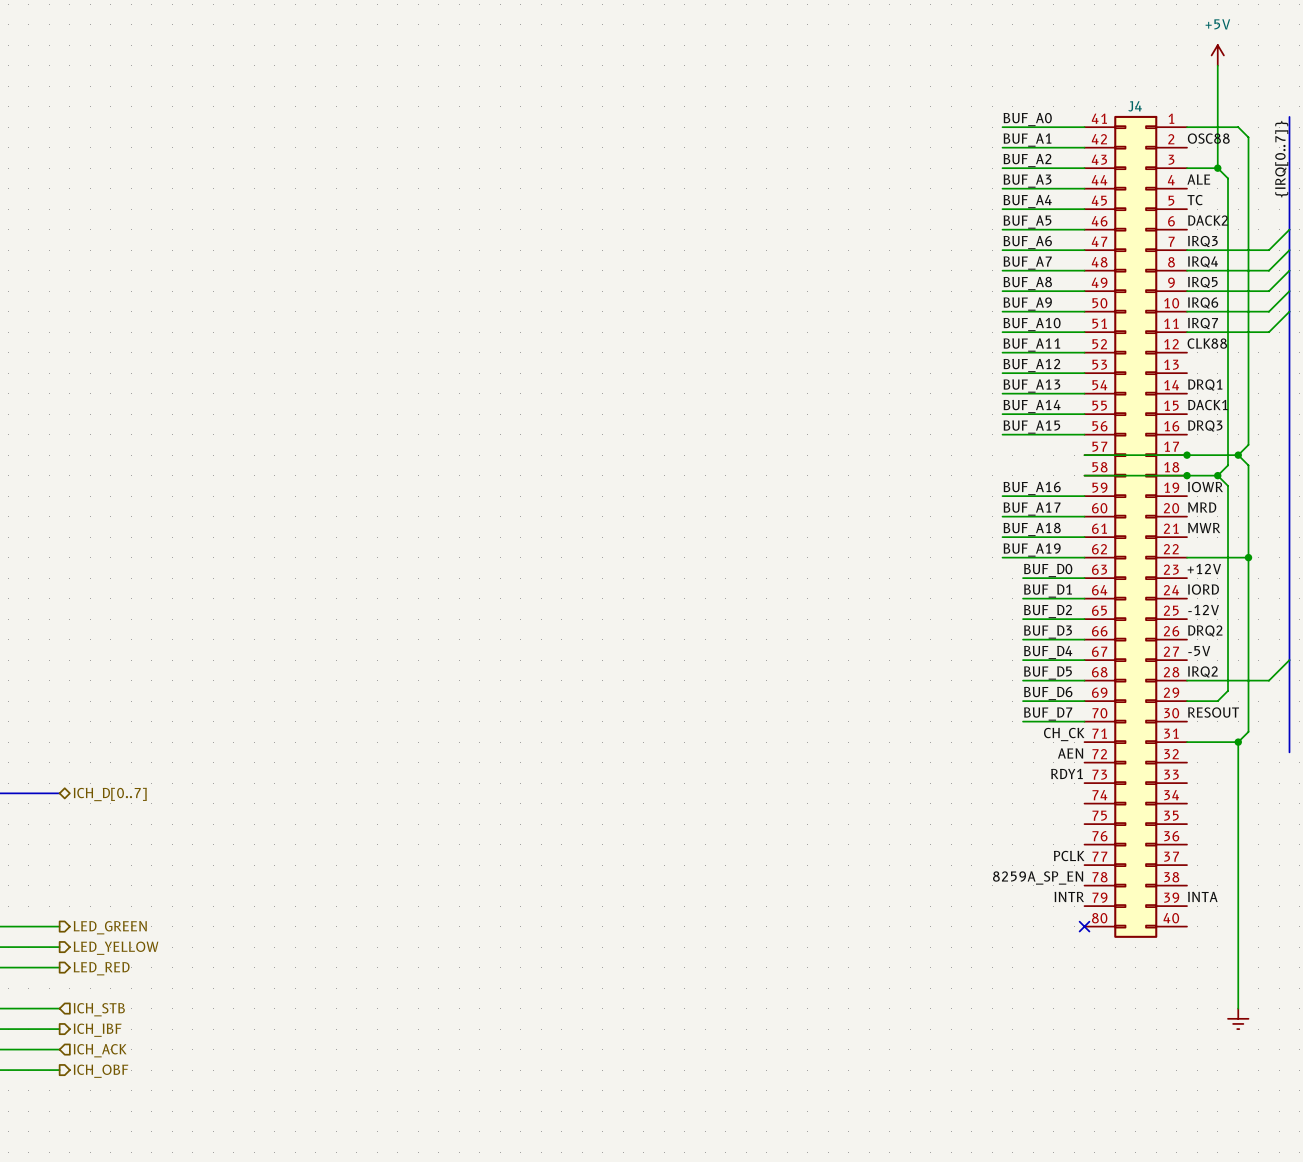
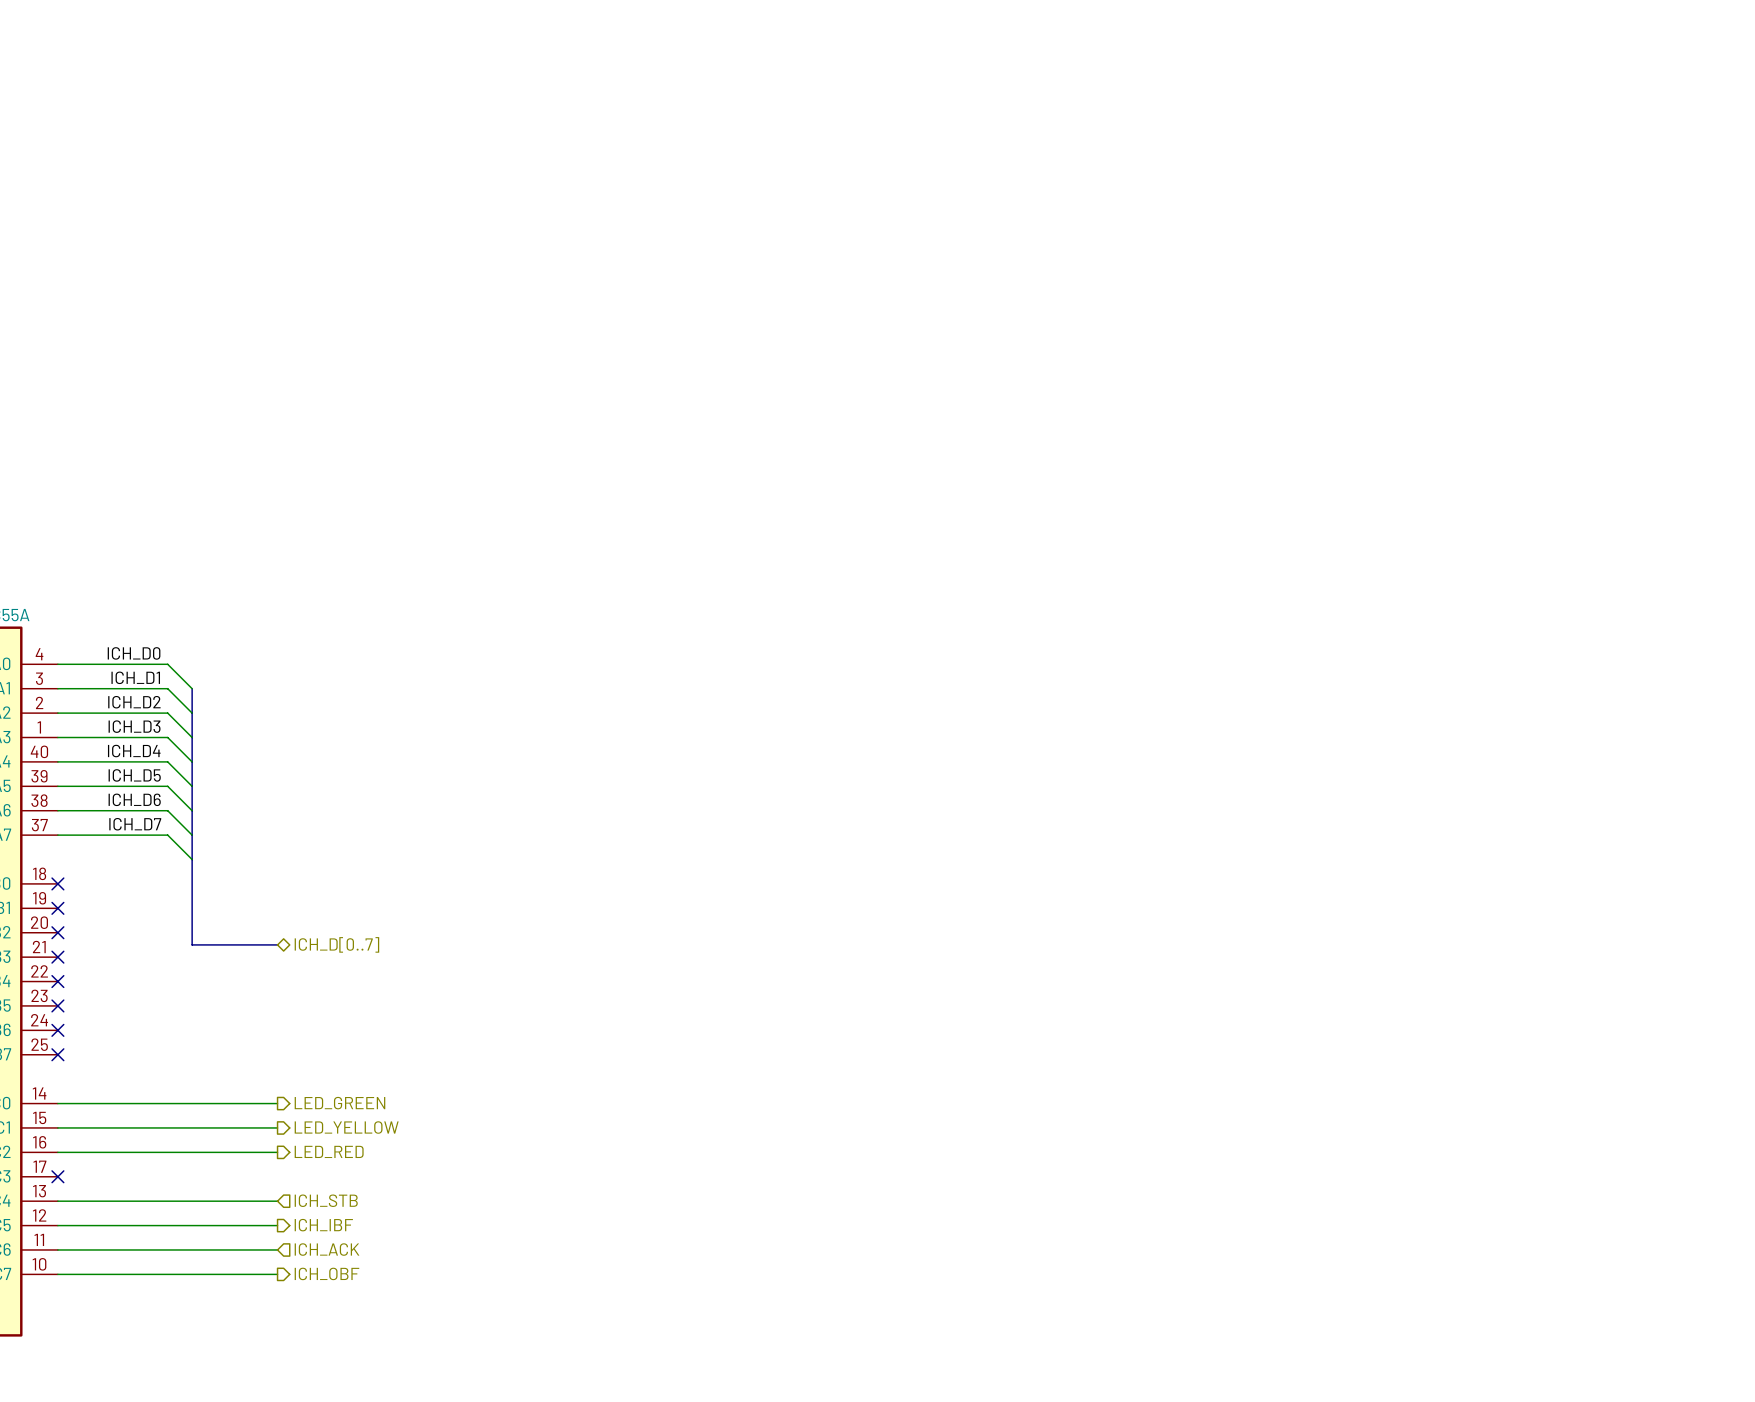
power symbol: +5V (1217, 55) -> none
wire: (1217, 65) (1217, 168) -> none
bus: (1289, 116) (1289, 752) -> none
label: BUF_A0 (1027, 119) -> none
wire: (1002, 127) (1084, 127) -> none
wire: (1187, 127) (1238, 127) (1248, 137) (1248, 444) (1238, 455) -> none
label: OSC88 (1208, 138) -> none
label: BUF_A1 (1027, 140) -> none
wire: (1002, 147) (1084, 147) -> none
label: {IRQ[0..7]} (1281, 159) -> none
label: BUF_A2 (1027, 160) -> none
wire: (1002, 168) (1084, 168) -> none
wire: (1187, 168) (1217, 168) -> none
wire: (1217, 168) (1228, 178) (1228, 465) (1217, 475) -> none
junction: (1217, 168) -> none
label: ALE (1198, 179) -> none
label: BUF_A3 (1027, 181) -> none
wire: (1002, 188) (1084, 188) -> none
label: TC (1195, 200) -> none
label: BUF_A4 (1027, 201) -> none
wire: (1002, 209) (1084, 209) -> none
label: DACK2 (1207, 220) -> none
label: BUF_A5 (1027, 222) -> none
wire: (1002, 229) (1084, 229) -> none
wire: (1289, 229) (1268, 250) (1187, 250) -> none
label: IRQ3 (1202, 241) -> none
label: BUF_A6 (1027, 242) -> none
wire: (1002, 250) (1084, 250) -> none
wire: (1289, 250) (1268, 270) (1187, 270) -> none
label: IRQ4 (1203, 262) -> none
label: BUF_A7 (1027, 263) -> none
wire: (1002, 270) (1084, 270) -> none
wire: (1289, 270) (1268, 291) (1187, 291) -> none
label: IRQ5 (1202, 282) -> none
label: BUF_A8 (1027, 283) -> none
wire: (1002, 291) (1084, 291) -> none
wire: (1289, 291) (1268, 311) (1187, 311) -> none
label: IRQ6 (1203, 303) -> none
label: BUF_A9 (1027, 304) -> none
wire: (1002, 311) (1084, 311) -> none
wire: (1289, 311) (1268, 332) (1187, 332) -> none
label: IRQ7 (1203, 323) -> none
label: BUF_A10 (1032, 324) -> none
wire: (1002, 332) (1084, 332) -> none
label: CLK88 (1207, 343) -> none
label: BUF_A11 (1031, 345) -> none
wire: (1002, 352) (1084, 352) -> none
label: BUF_A12 (1031, 365) -> none
wire: (1002, 373) (1084, 373) -> none
label: DRQ1 (1205, 384) -> none
label: BUF_A13 (1031, 386) -> none
wire: (1002, 393) (1084, 393) -> none
label: DACK1 (1207, 405) -> none
label: BUF_A14 (1032, 406) -> none
wire: (1002, 414) (1084, 414) -> none
label: DRQ3 (1205, 426) -> none
label: BUF_A15 (1031, 427) -> none
wire: (1002, 434) (1084, 434) -> none
wire: (1084, 455) (1238, 455) -> none
junction: (1187, 455) -> none
wire: (1238, 455) (1248, 465) (1248, 731) (1238, 742) -> none
junction: (1238, 455) -> none
wire: (1084, 475) (1217, 475) -> none
junction: (1187, 475) -> none
wire: (1217, 475) (1228, 485) (1228, 690) (1217, 701) (1187, 701) -> none
junction: (1217, 475) -> none
label: IOWR (1205, 487) -> none
label: BUF_A16 (1032, 488) -> none
wire: (1002, 496) (1084, 496) -> none
label: MRD (1202, 507) -> none
label: BUF_A17 (1032, 509) -> none
wire: (1002, 516) (1084, 516) -> none
J4: (1135, 526) -> none
label: MWR (1204, 527) -> none
label: BUF_A18 (1032, 529) -> none
wire: (1002, 537) (1084, 537) -> none
label: BUF_A19 (1032, 550) -> none
wire: (1002, 557) (1084, 557) -> none
wire: (1187, 557) (1248, 557) -> none
junction: (1248, 557) -> none
label: +12V (1204, 569) -> none
label: BUF_D0 (1048, 570) -> none
wire: (1023, 578) (1084, 578) -> none
label: IORD (1203, 589) -> none
label: BUF_D1 (1048, 591) -> none
wire: (1023, 598) (1084, 598) -> none
label: -12V (1203, 610) -> none
label: BUF_D2 (1048, 611) -> none
wire: (1023, 619) (1084, 619) -> none
label: DRQ2 (1205, 630) -> none
label: BUF_D3 (1048, 632) -> none
wire: (1023, 639) (1084, 639) -> none
label: -5V (1199, 651) -> none
label: BUF_D4 (1048, 652) -> none
wire: (1023, 660) (1084, 660) -> none
wire: (1289, 660) (1268, 680) (1187, 680) -> none
label: IRQ2 (1202, 671) -> none
label: BUF_D5 (1048, 673) -> none
wire: (1023, 680) (1084, 680) -> none
label: BUF_D6 (1048, 693) -> none
wire: (1023, 701) (1084, 701) -> none
label: RESOUT (1213, 712) -> none
label: BUF_D7 (1048, 714) -> none
wire: (1023, 721) (1084, 721) -> none
label: CH_CK (1064, 734) -> none
wire: (1187, 742) (1238, 742) -> none
wire: (1238, 742) (1238, 1008) -> none
junction: (1238, 742) -> none
label: AEN (1070, 753) -> none
label: RDY1 (1067, 773) -> none
label: PCLK (1069, 856) -> none
label: 8259A_SP_EN (1038, 877) -> none
label: INTR (1069, 896) -> none
label: INTA (1202, 896) -> none
no-connect mark: (1084, 926) -> none
power symbol: (1238, 1018) -> none

